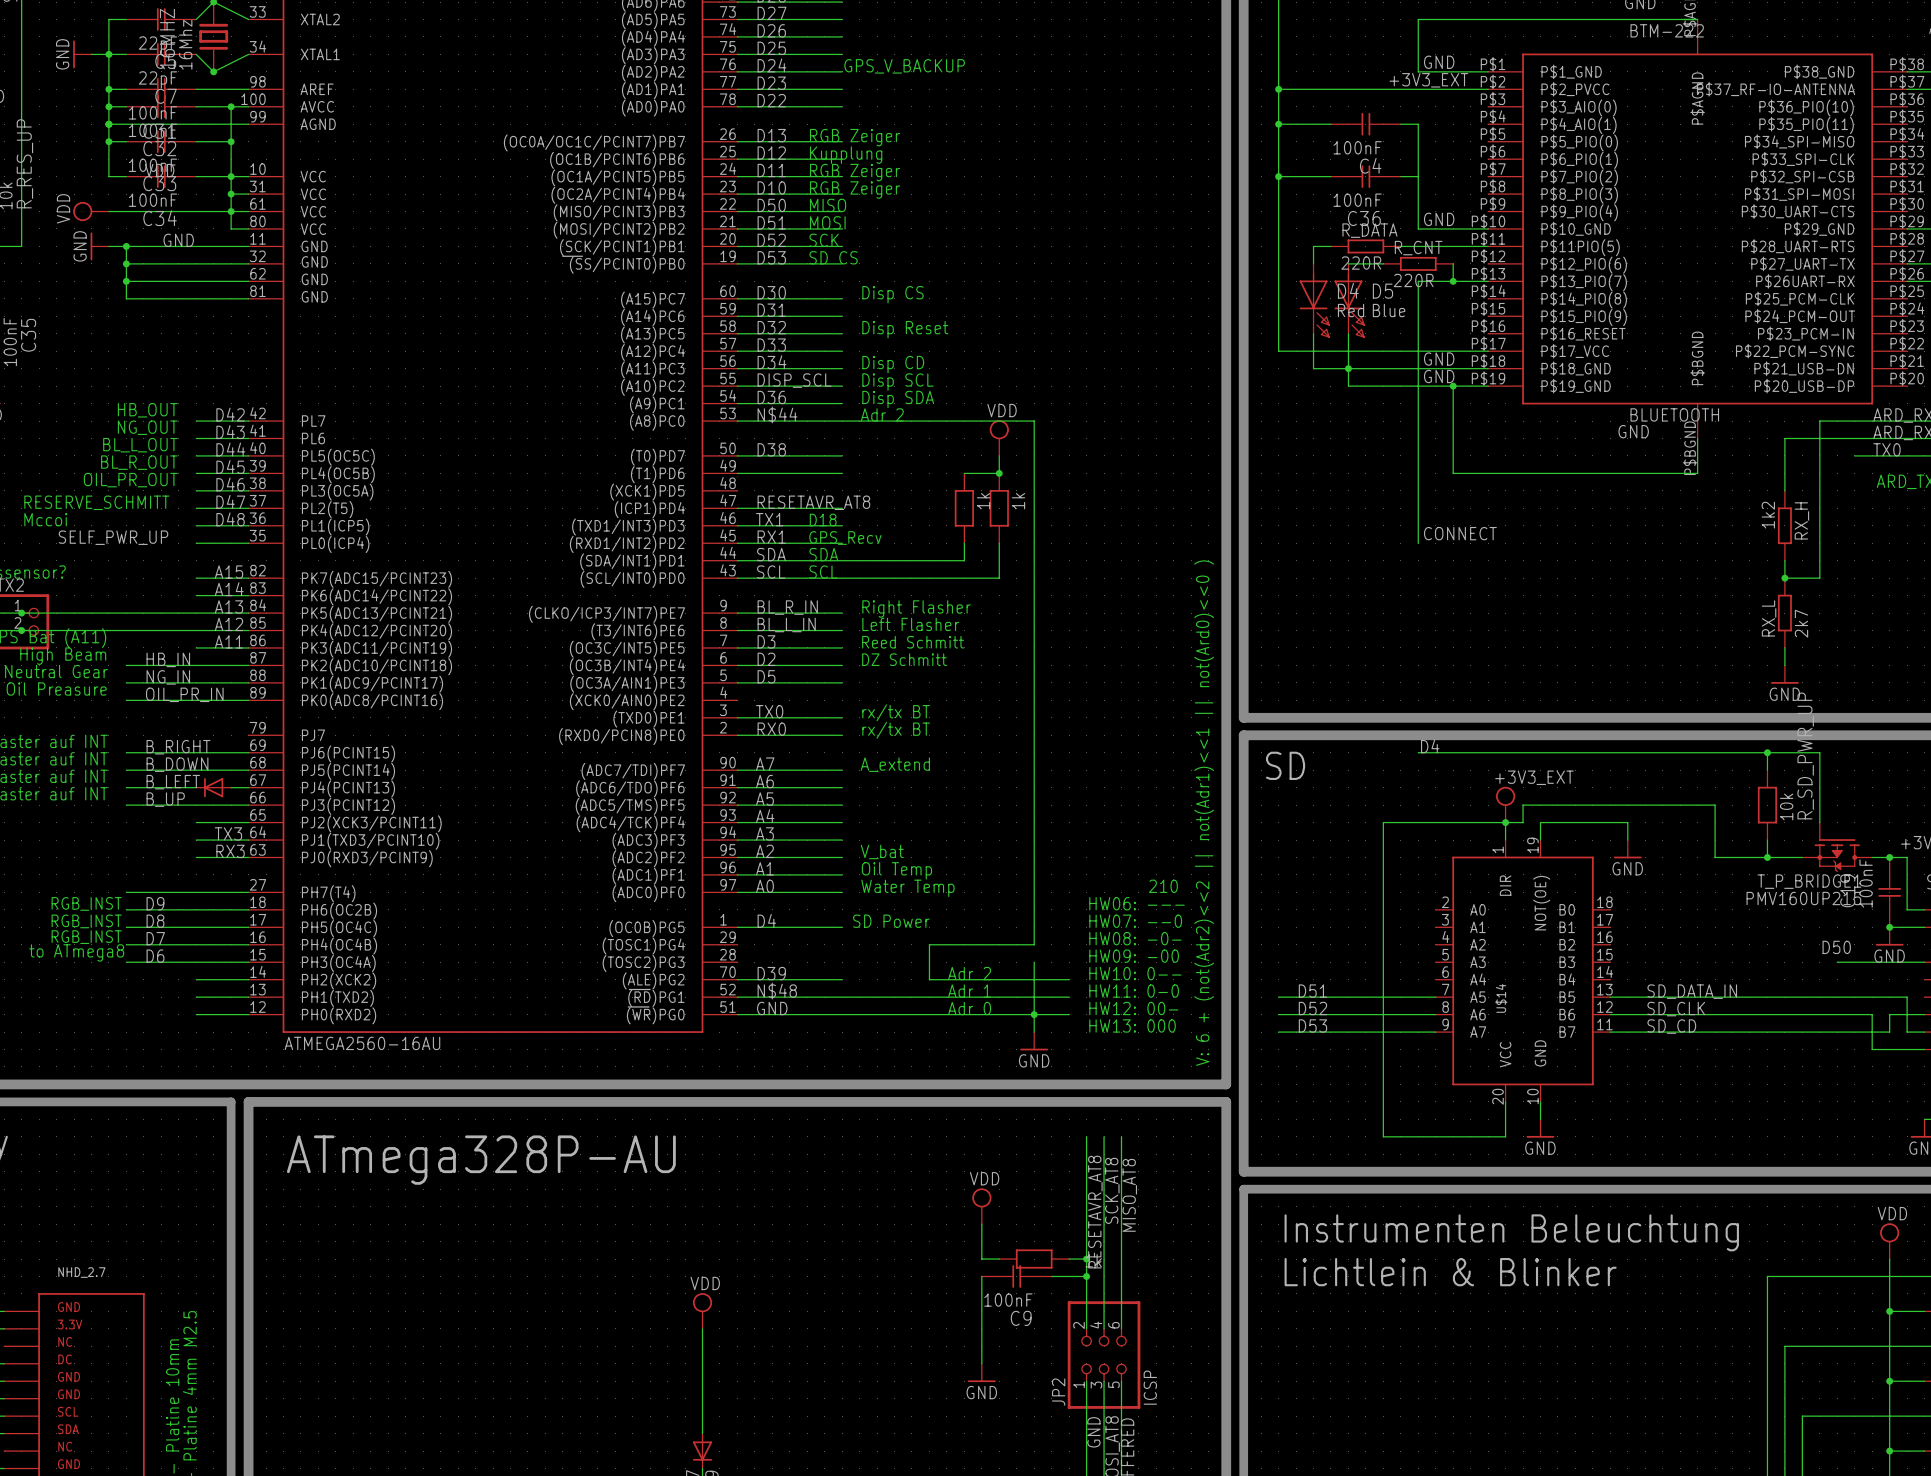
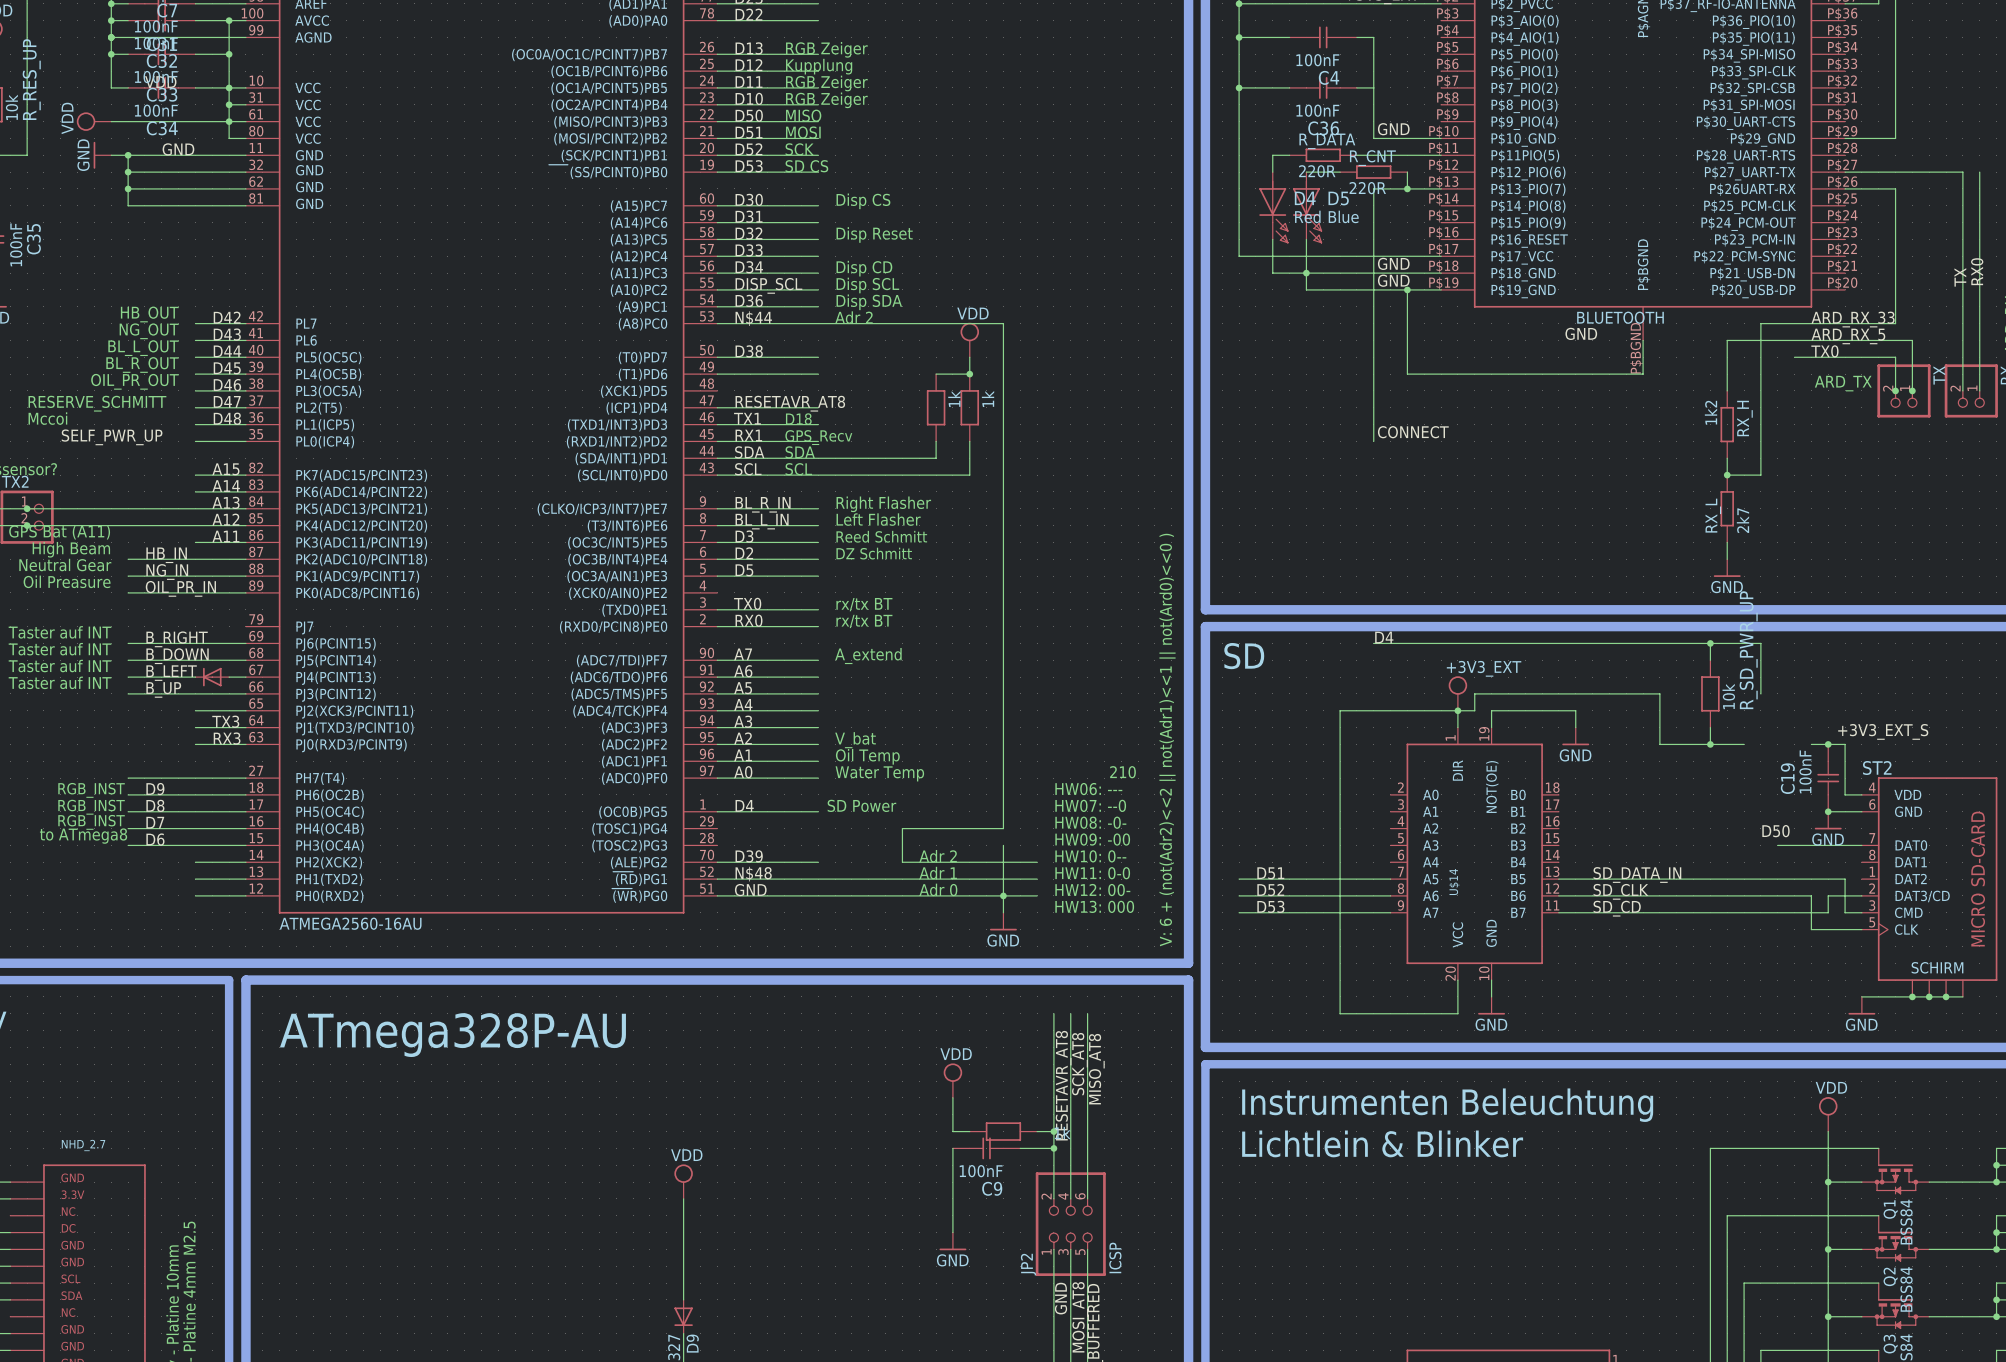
wire: (1819, 805) (1819, 822) -> none
T_P_BRIDGE1: PMV160UP215 (1837, 847) -> none

